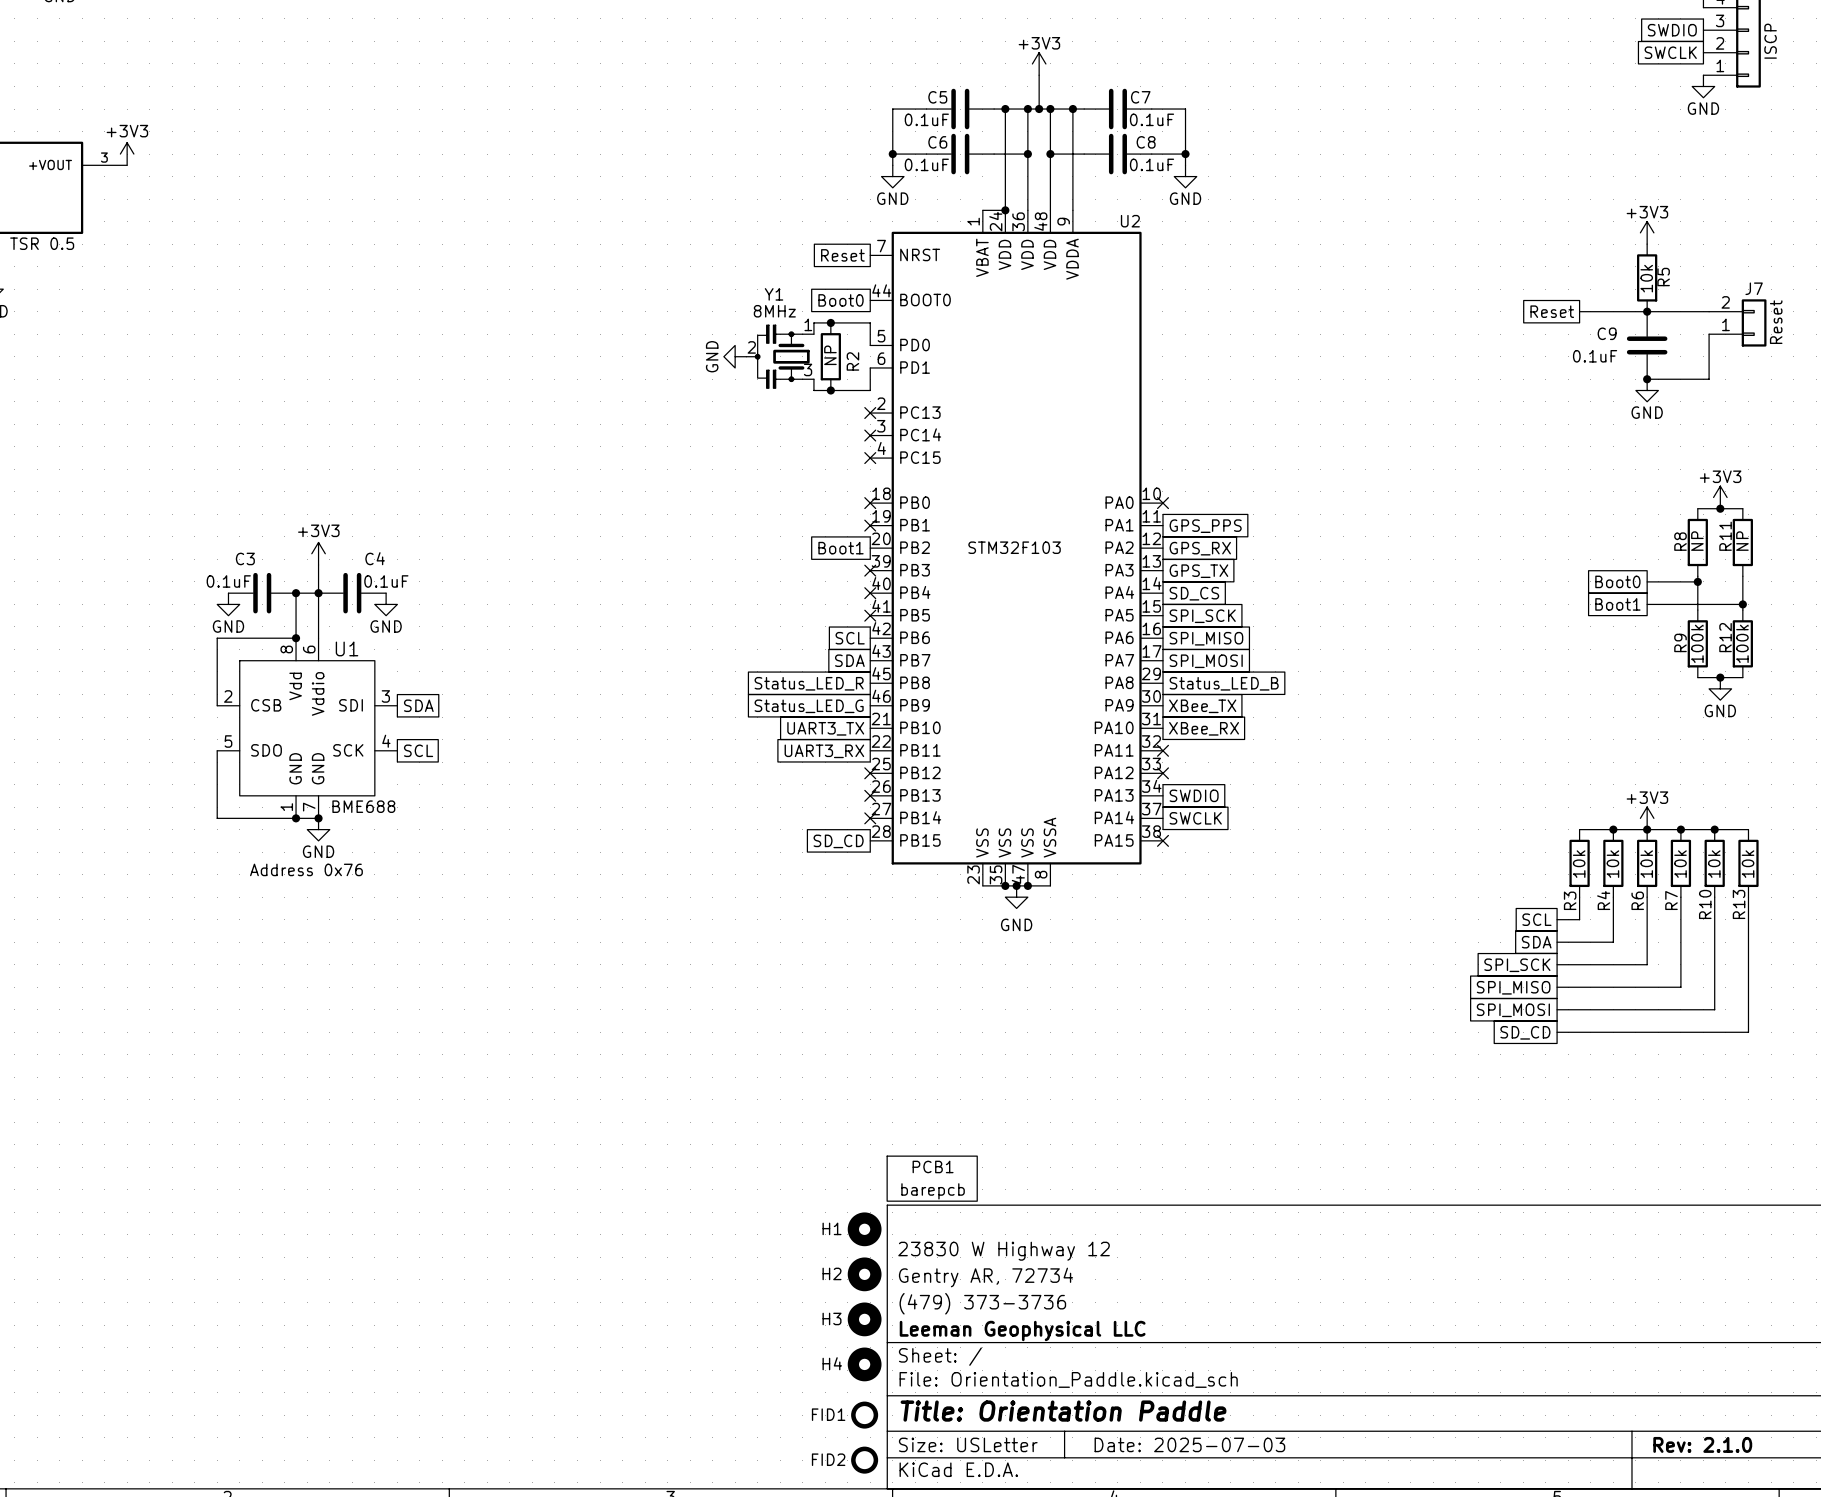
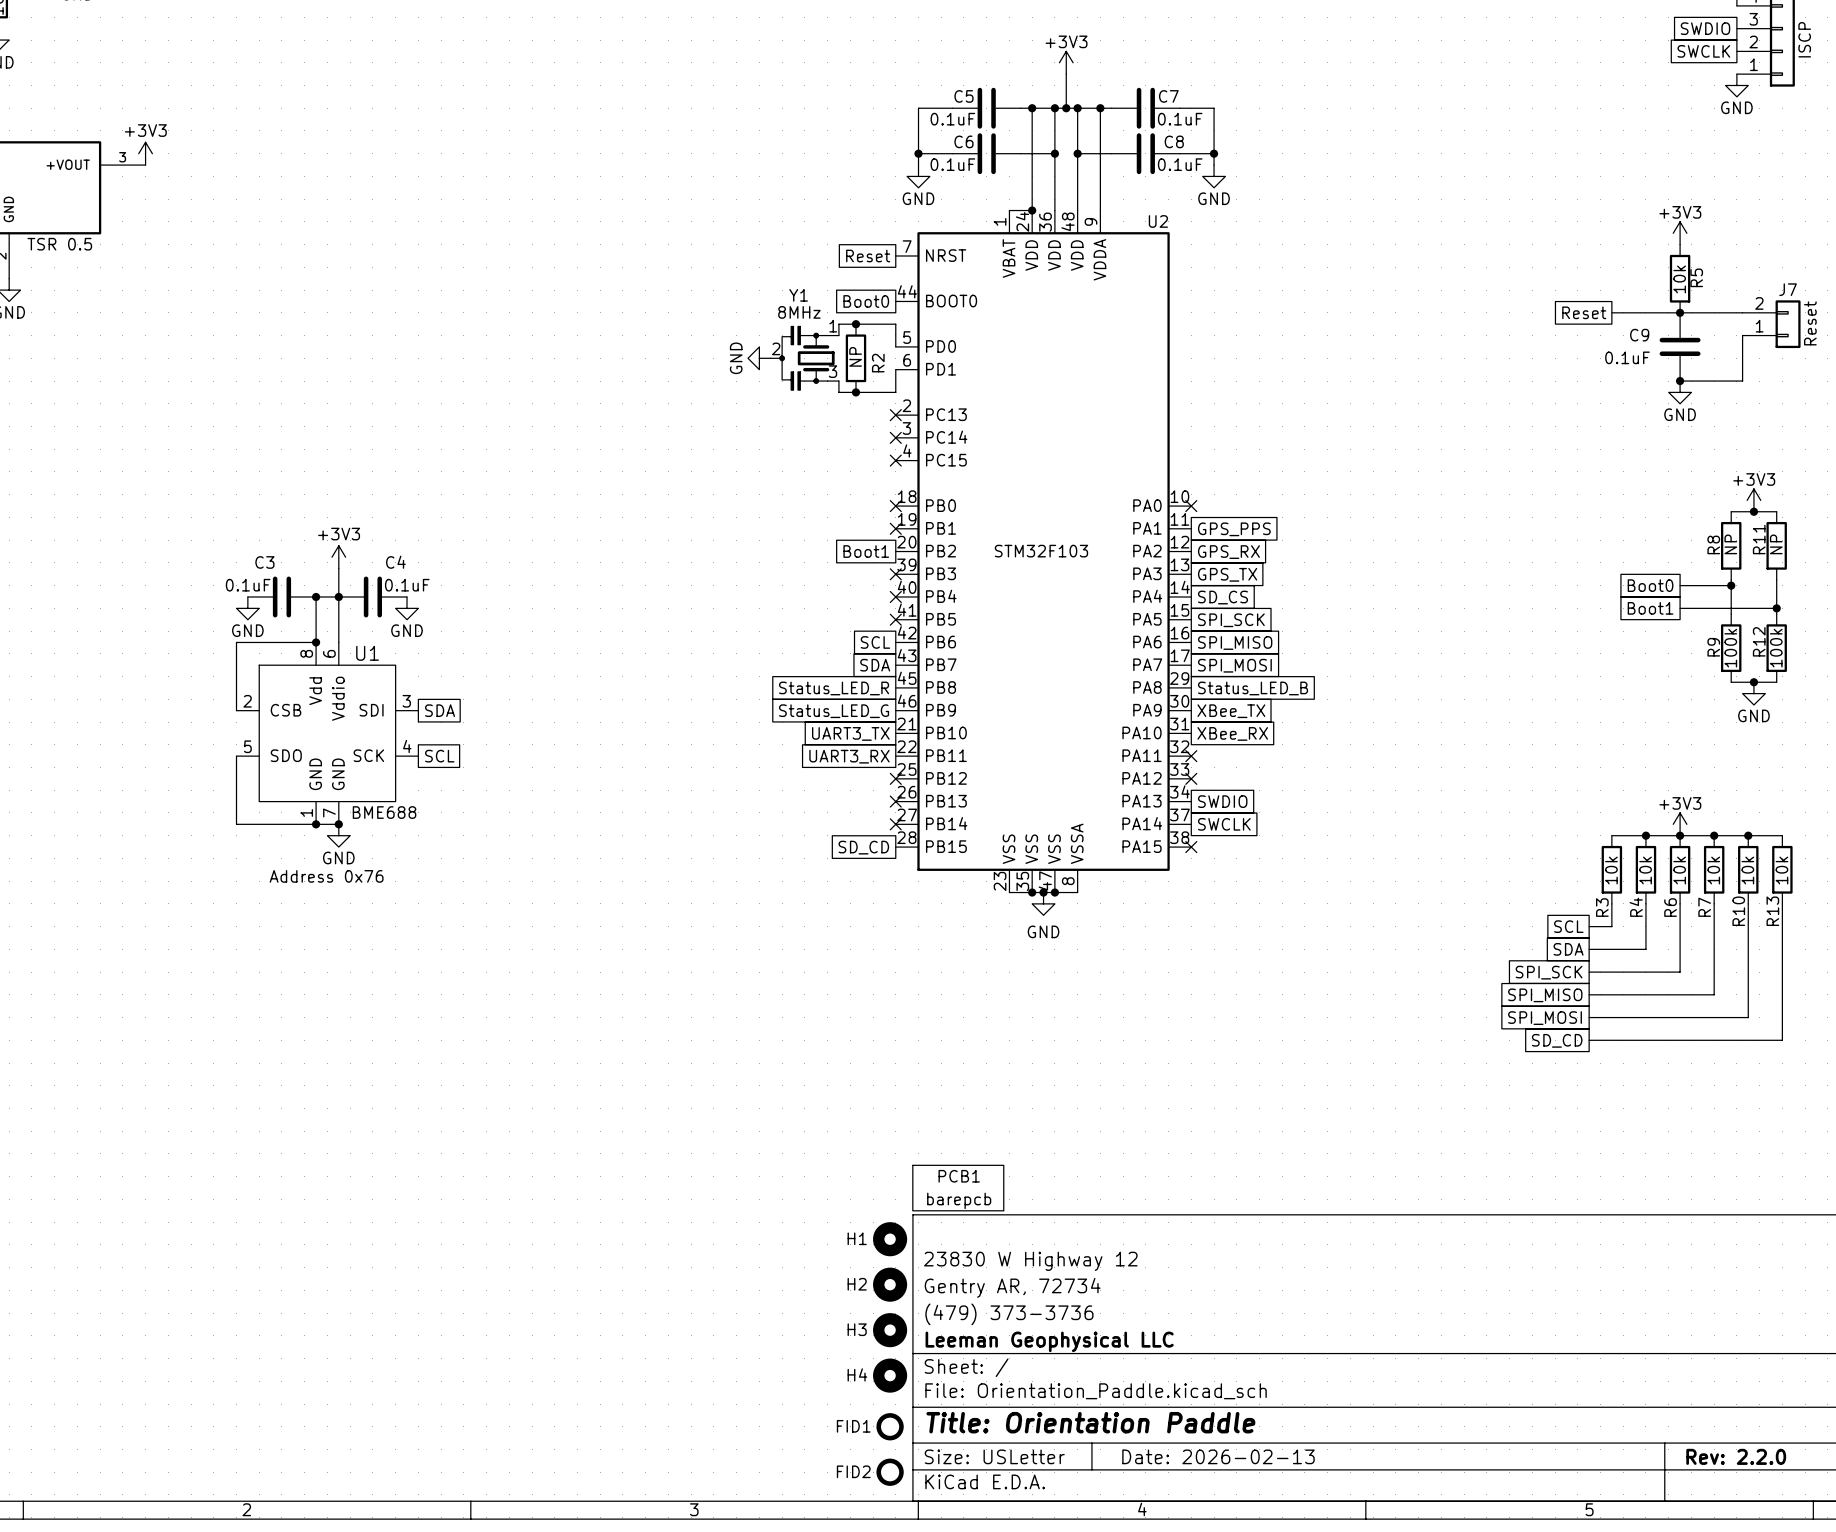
title block: Date: 2025-07-03 (1189, 1444) -> Date: 2026-02-13 (1218, 1456)
title block: Rev: 2.1.0 (1702, 1444) -> Rev: 2.2.0 (1736, 1456)

